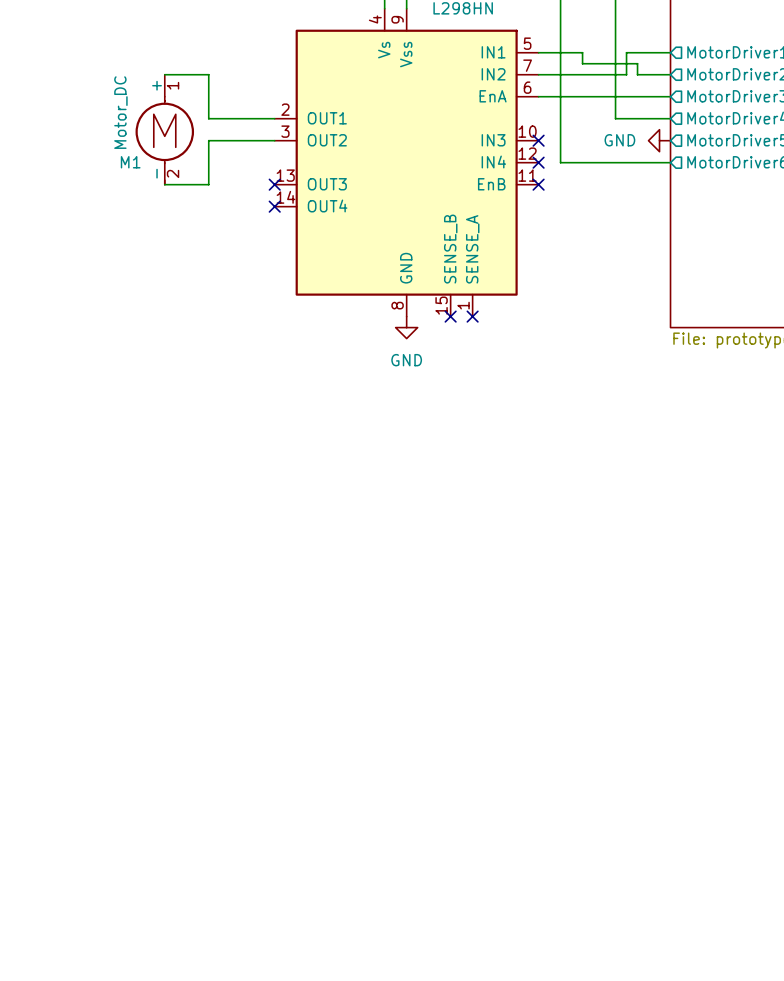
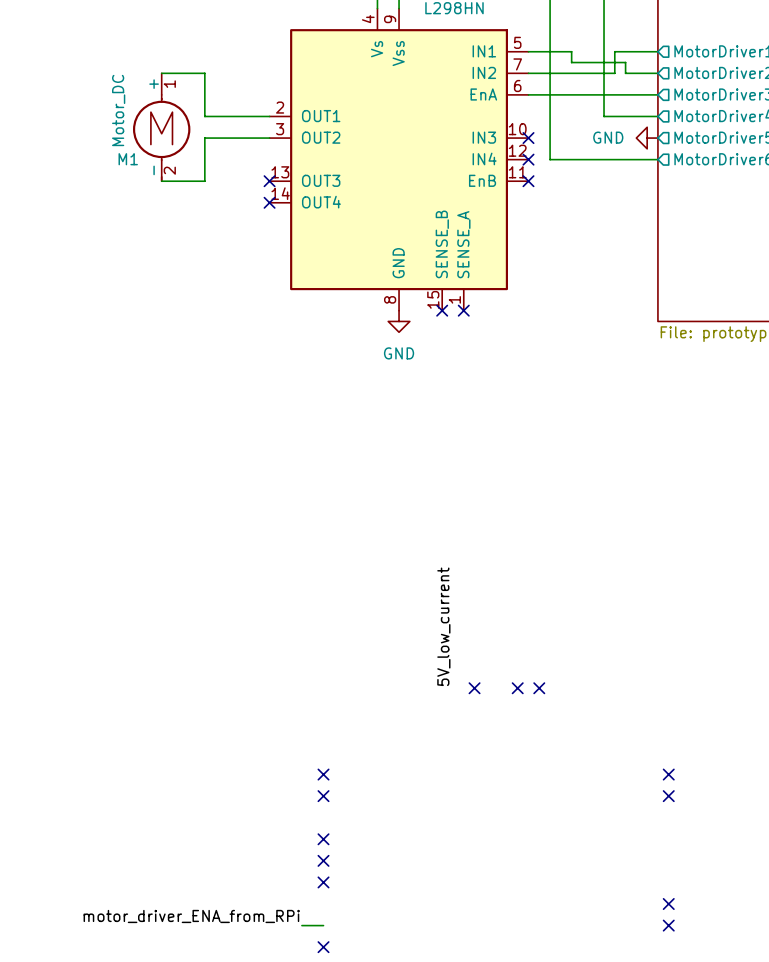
label: none -> 5V_low_current (443, 626)
no-connect mark: none -> (474, 688)
no-connect mark: none -> (517, 688)
no-connect mark: none -> (539, 688)
no-connect mark: none -> (323, 774)
no-connect mark: none -> (668, 774)
no-connect mark: none -> (323, 796)
no-connect mark: none -> (668, 796)
no-connect mark: none -> (323, 839)
no-connect mark: none -> (323, 860)
no-connect mark: none -> (323, 882)
no-connect mark: none -> (668, 904)
label: none -> motor_driver_ENA_from_RPi (191, 916)
wire: none -> (301, 925) (323, 925)
no-connect mark: none -> (668, 925)
no-connect mark: none -> (323, 947)

